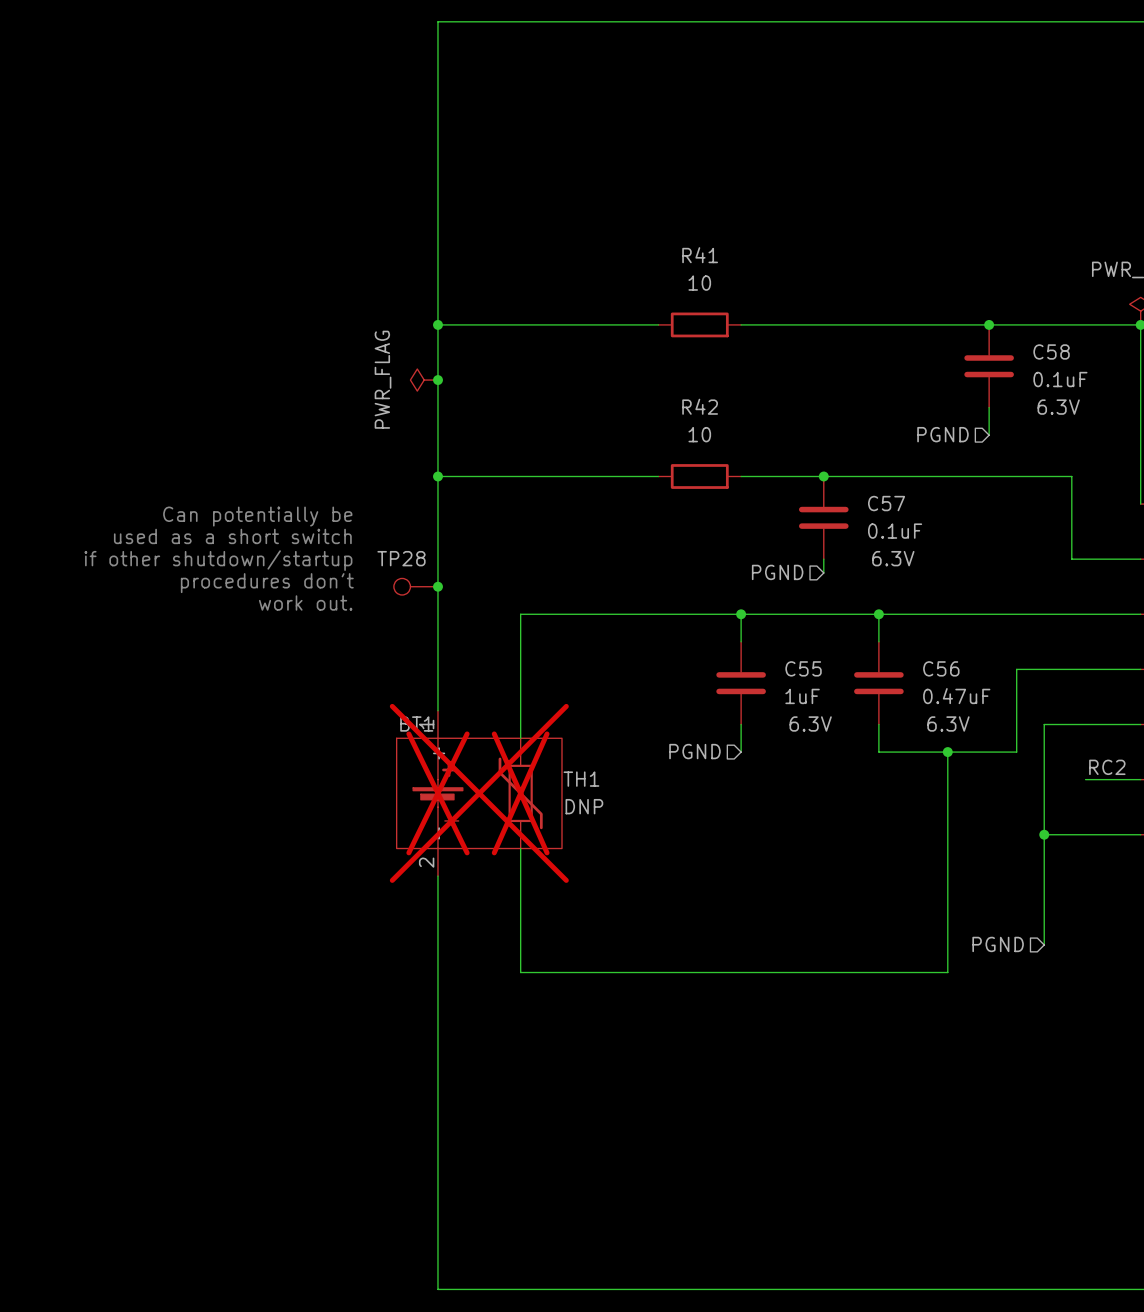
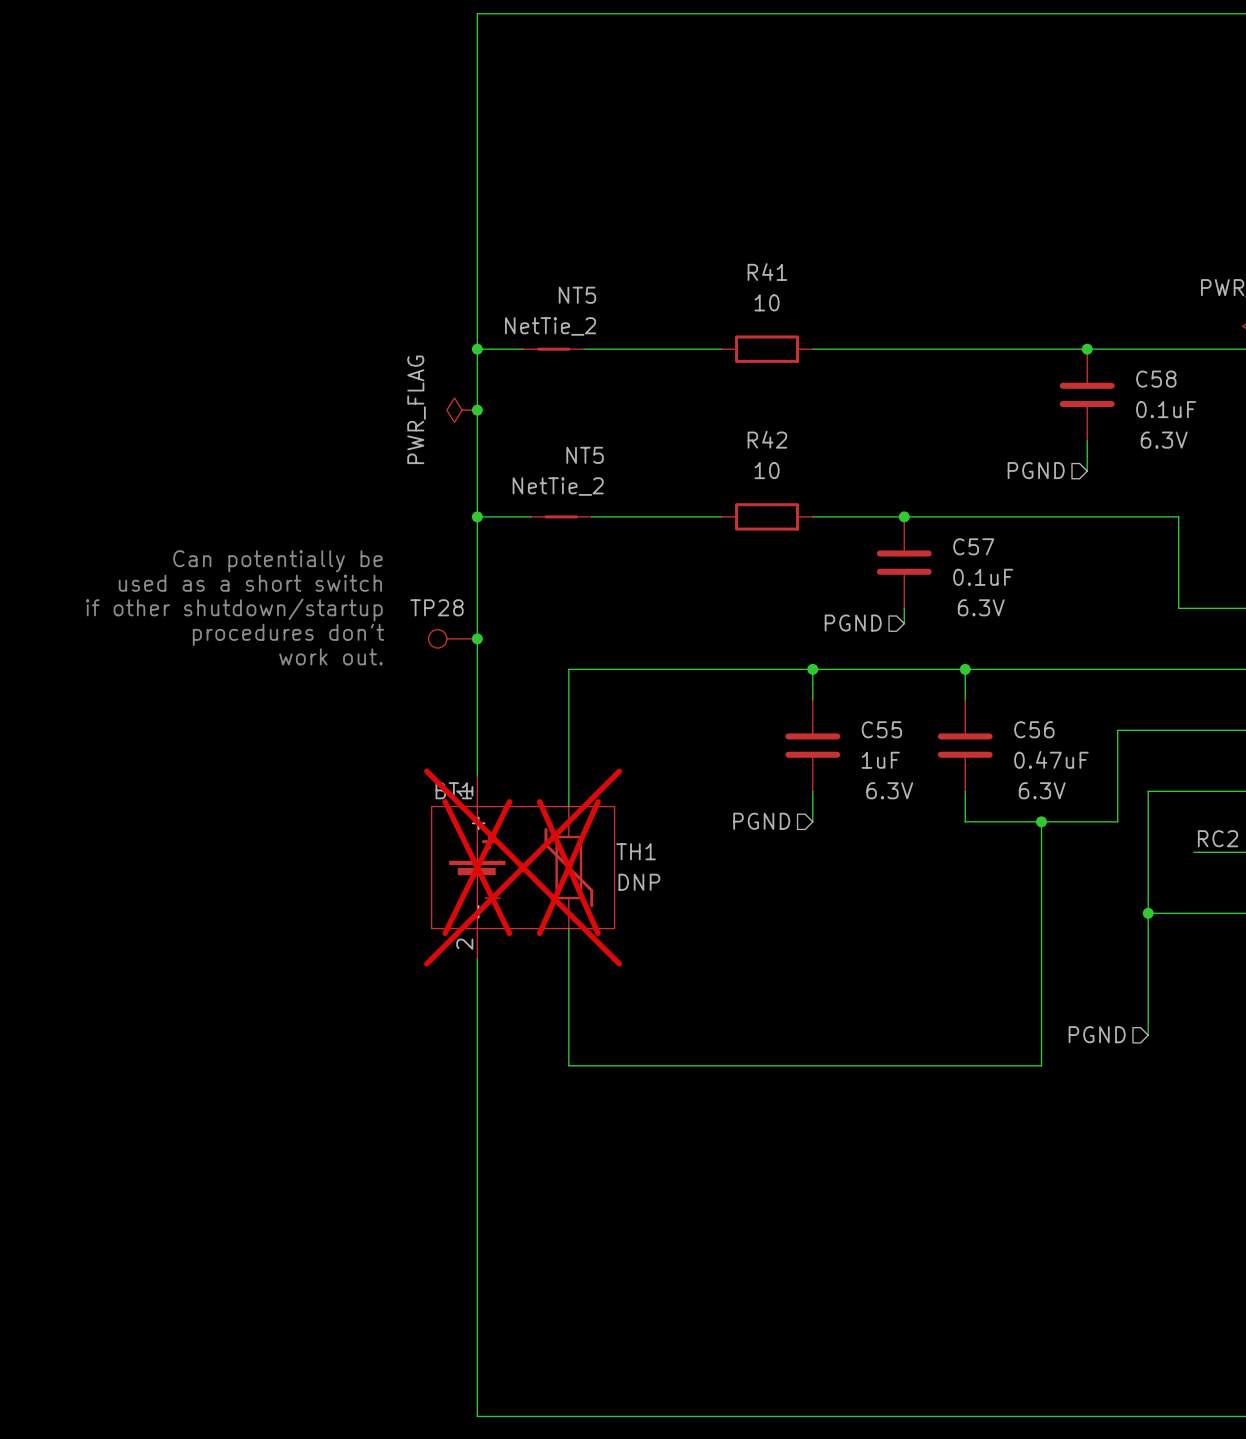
NT5: none -> NetTie_2 (553, 349)
NT5: none -> NetTie_2 (561, 516)

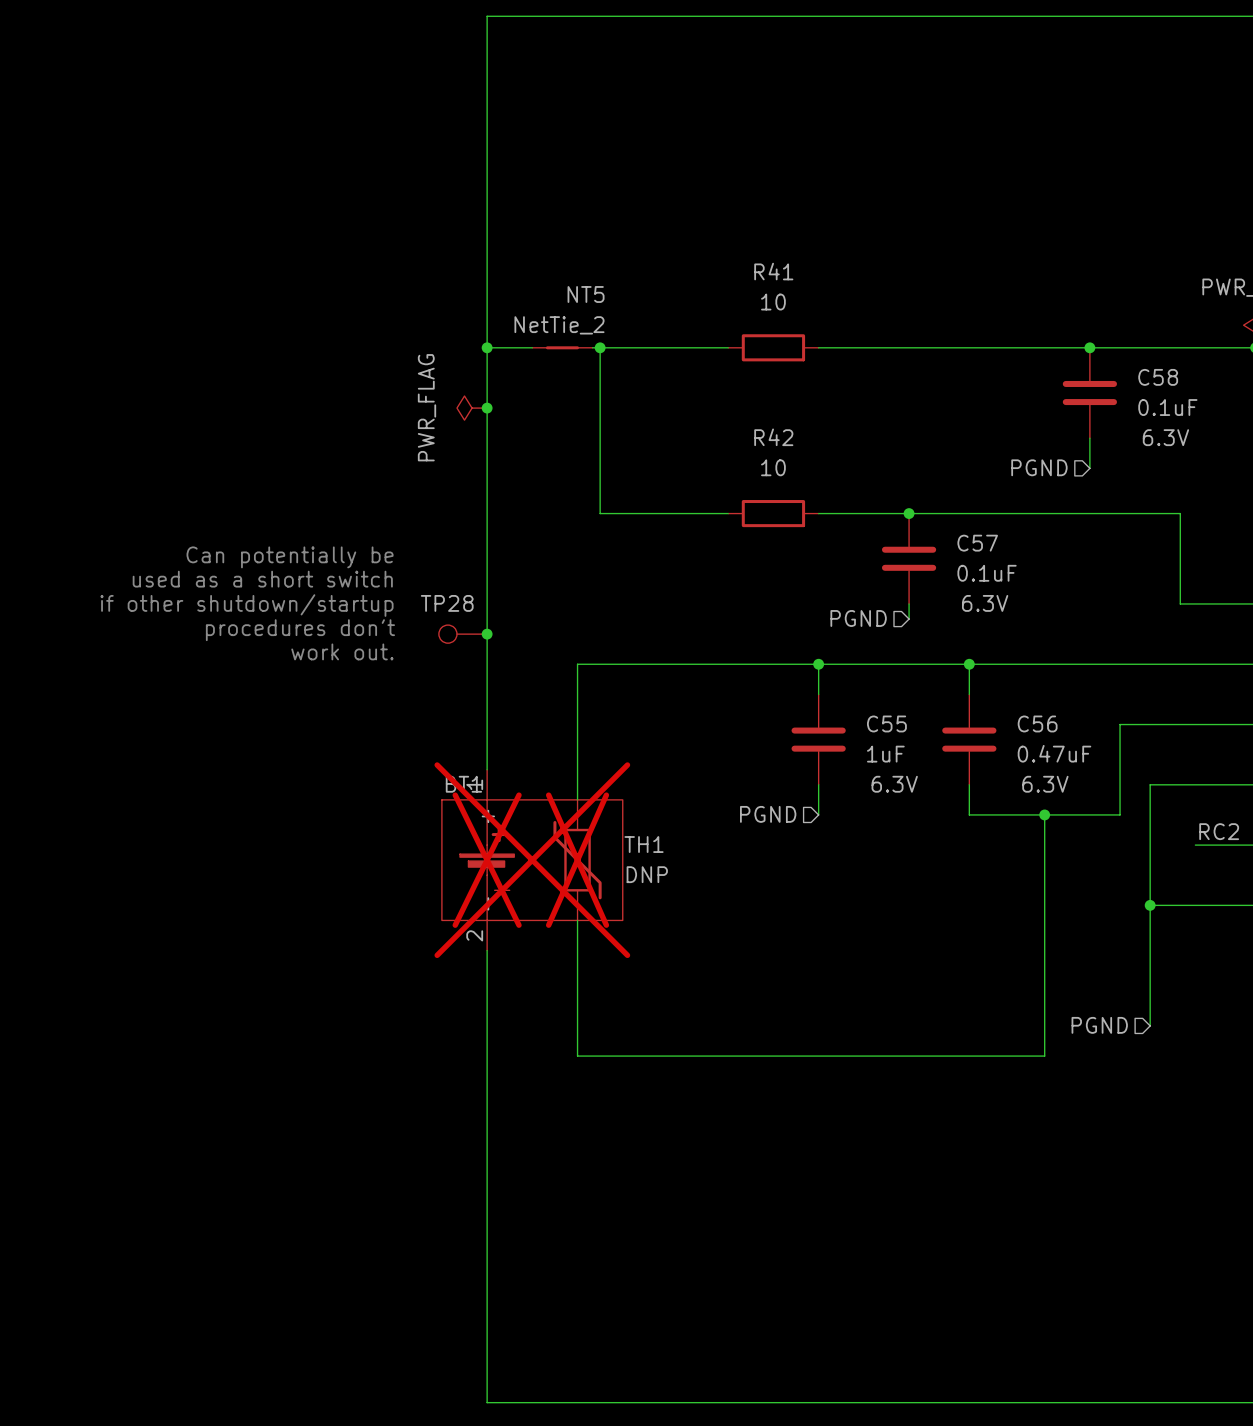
wire: none -> (600, 347) (600, 513)
junction: none -> (600, 347)
wire: (477, 516) (530, 516) -> none
junction: (477, 516) -> none
NT5: NetTie_2 (561, 516) -> none

